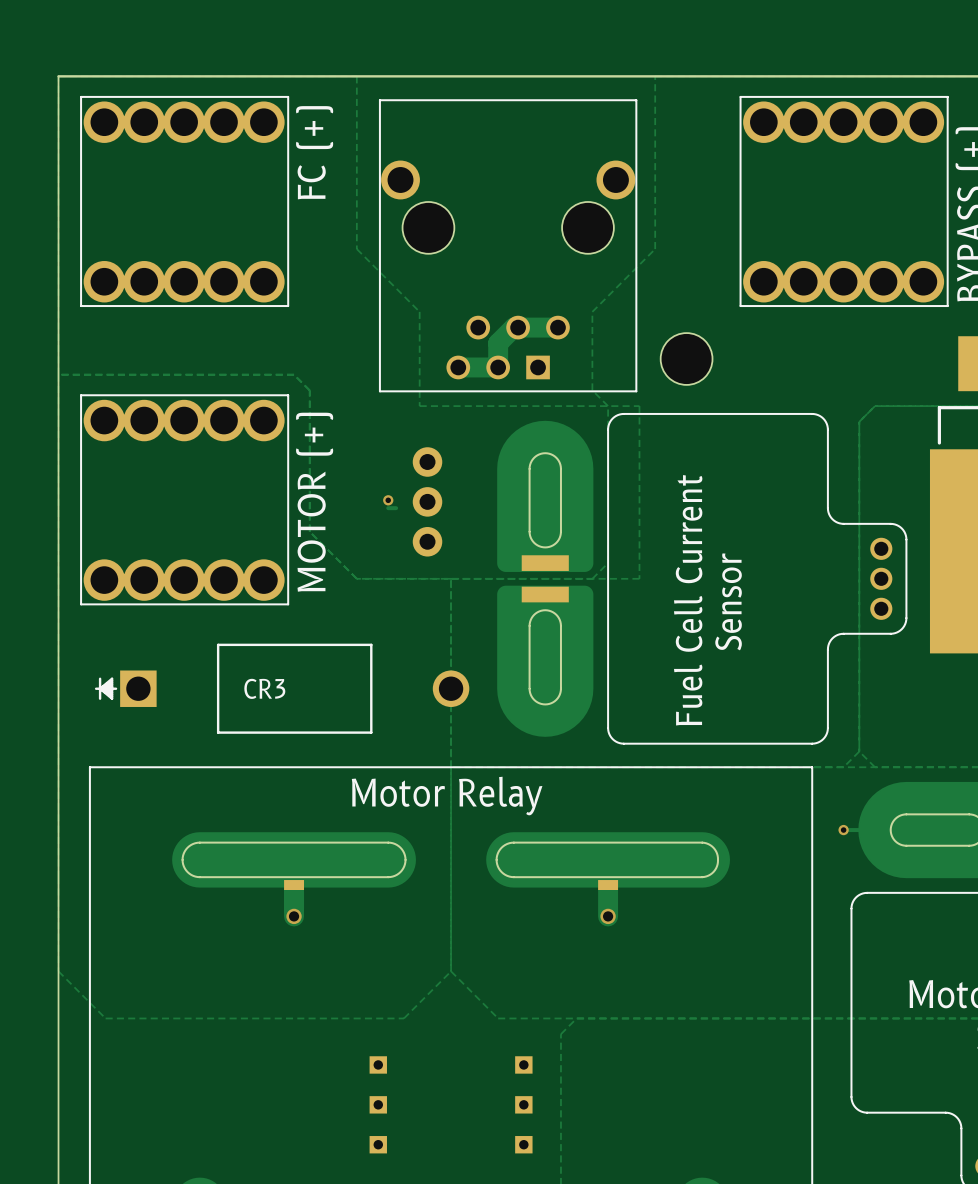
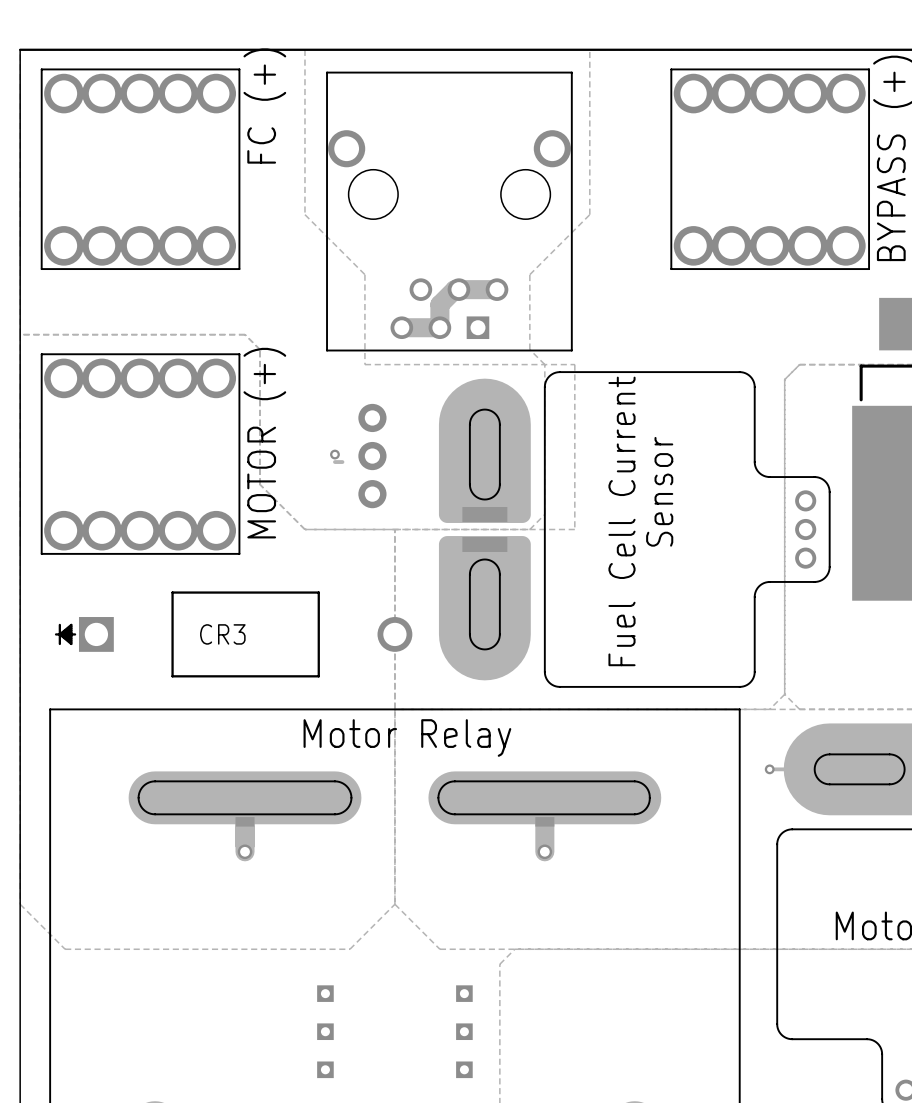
part: (686, 358) -> none

